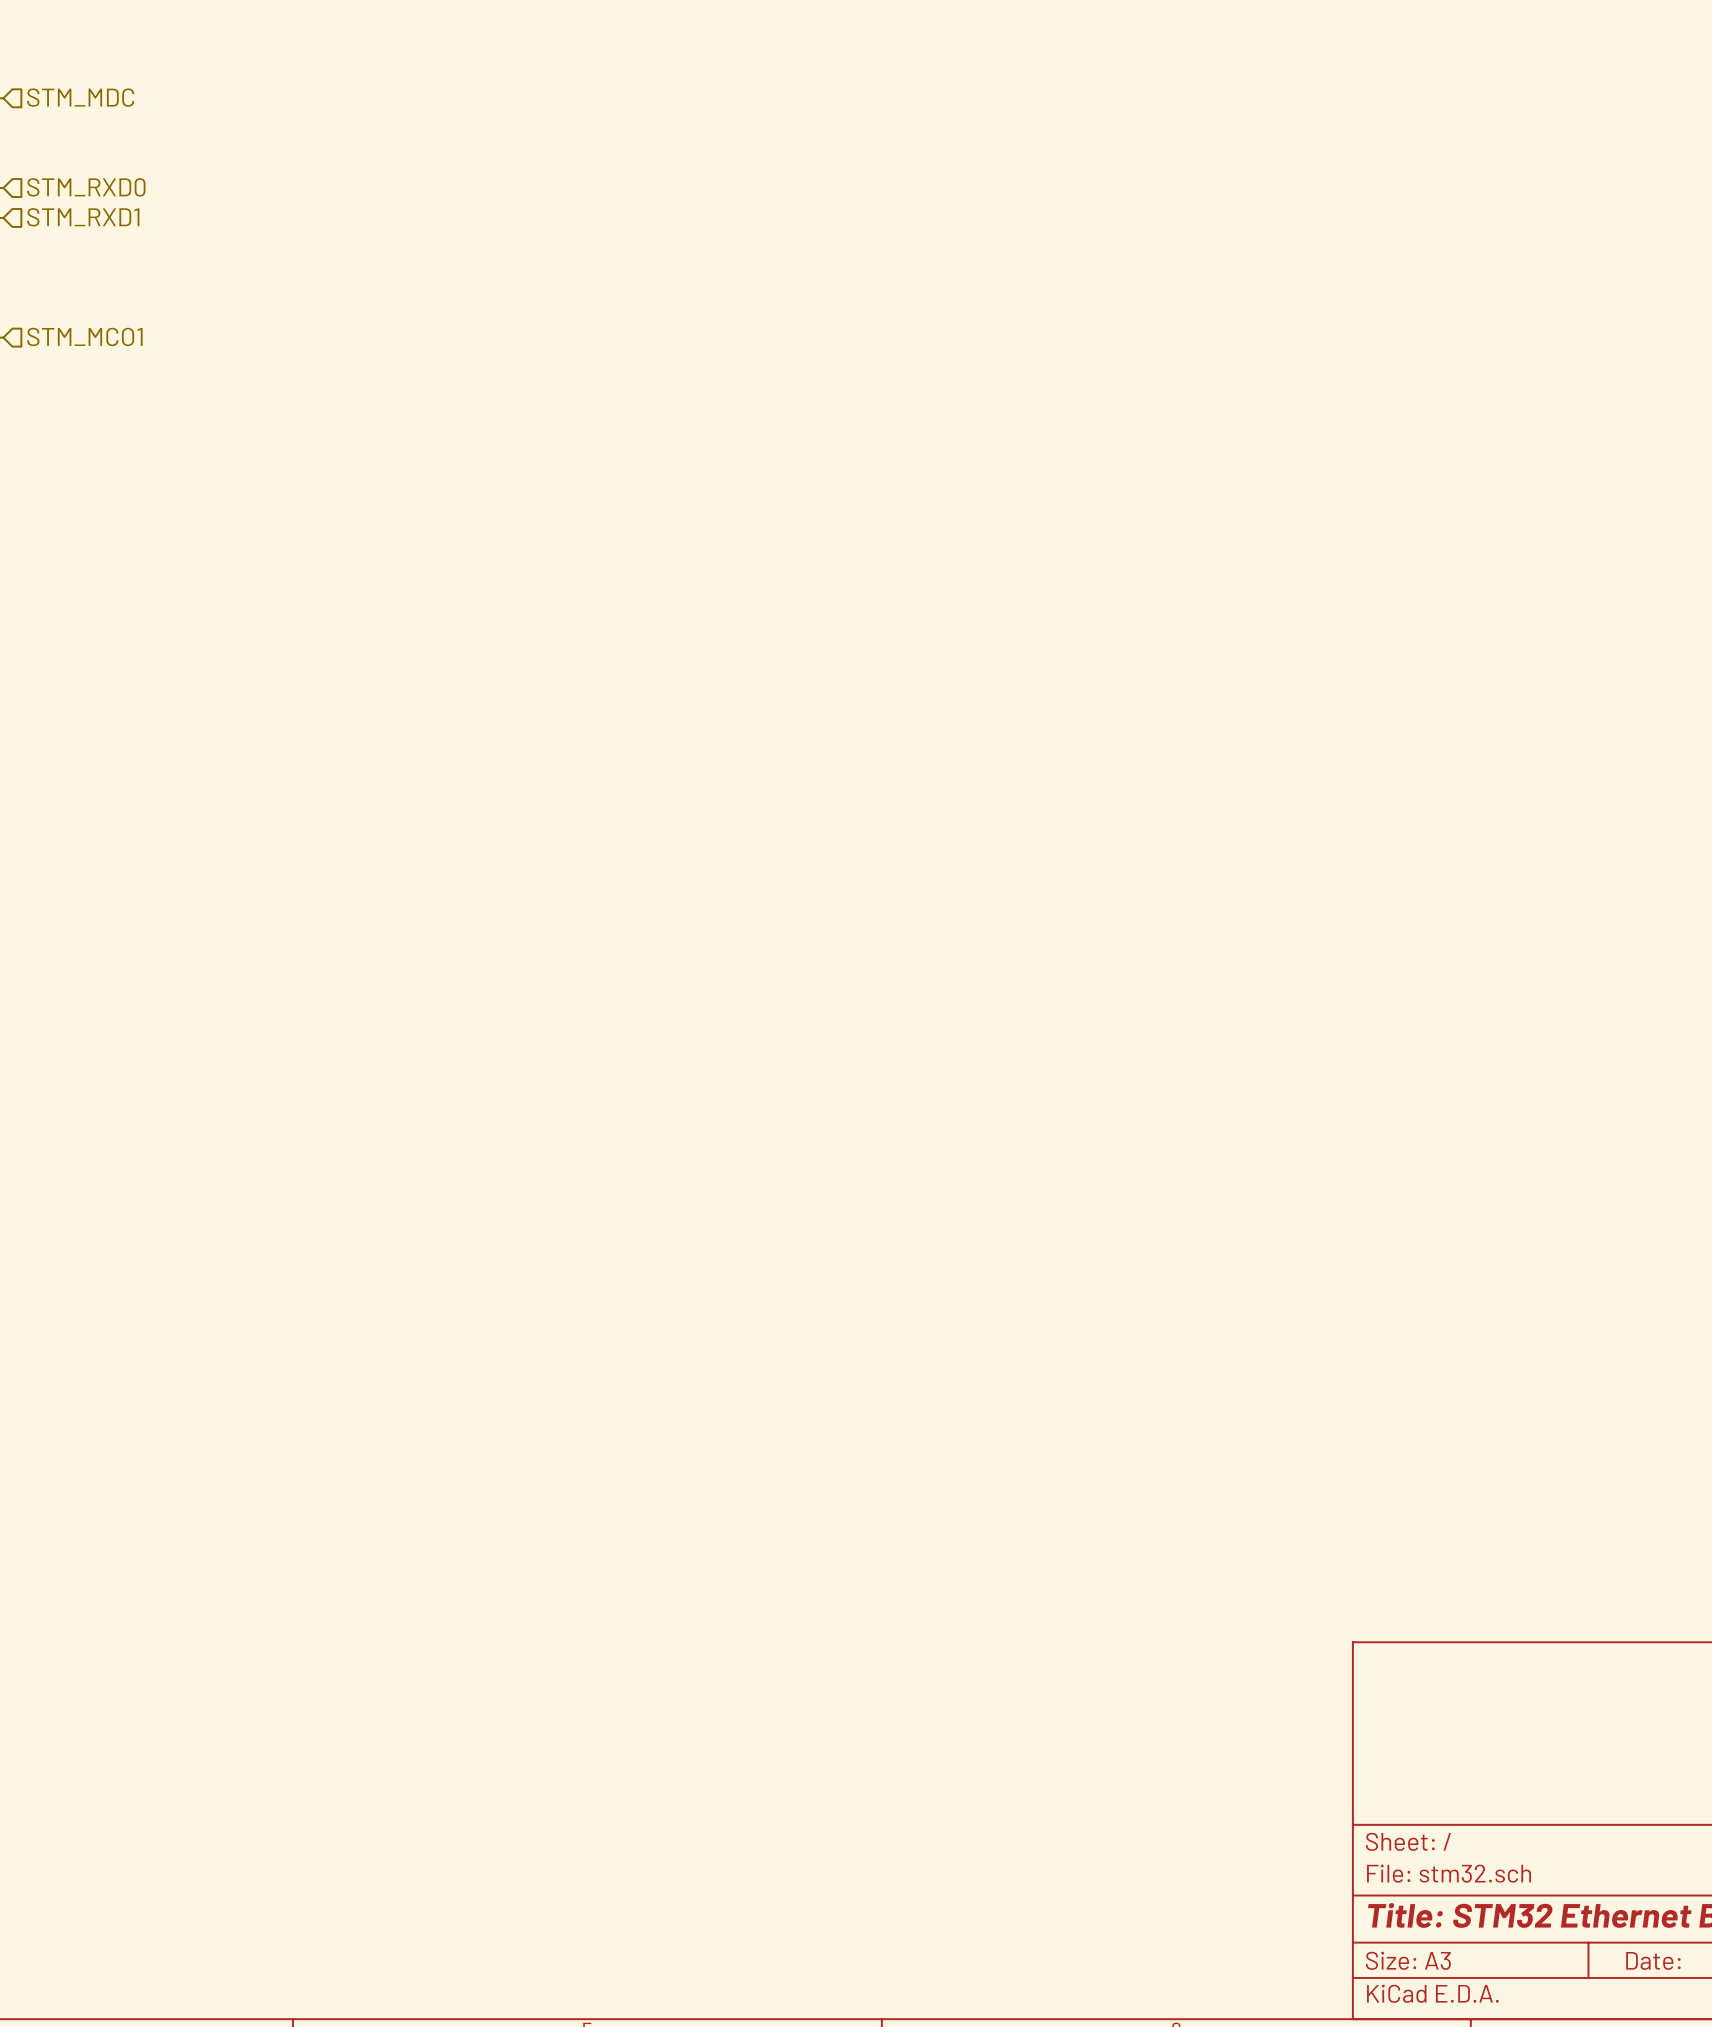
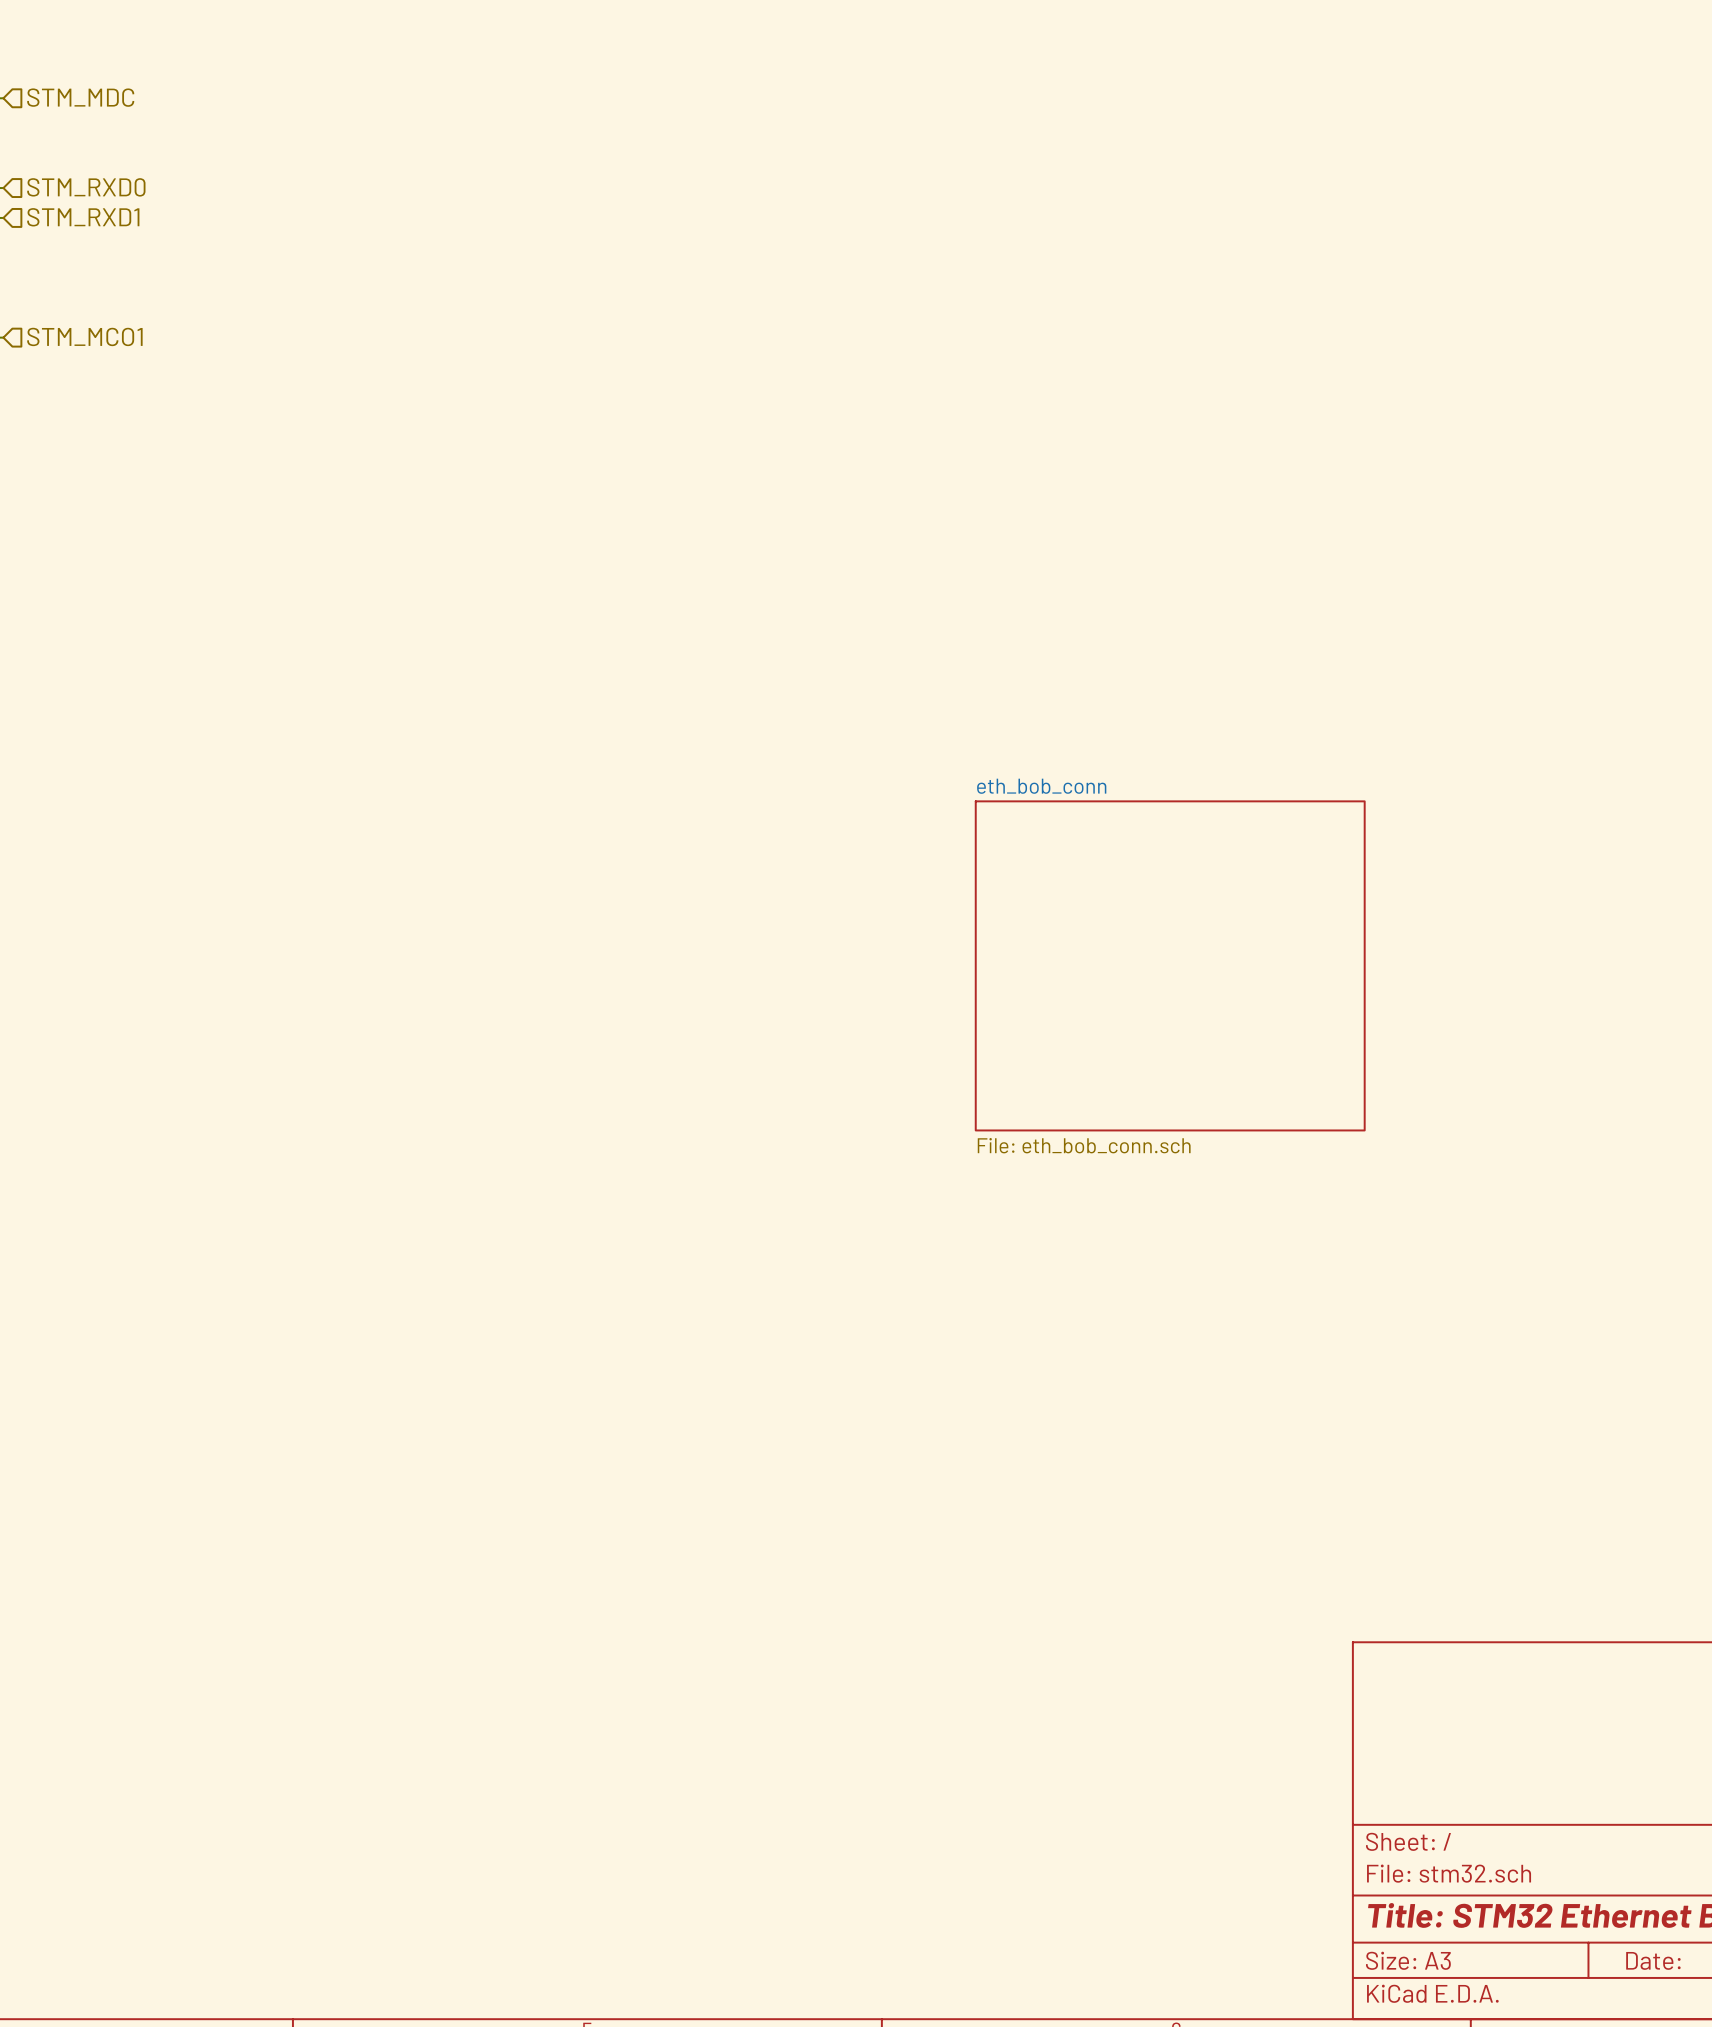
sheet eth_bob_conn: none -> File: eth_bob_conn.sch (1170, 965)

